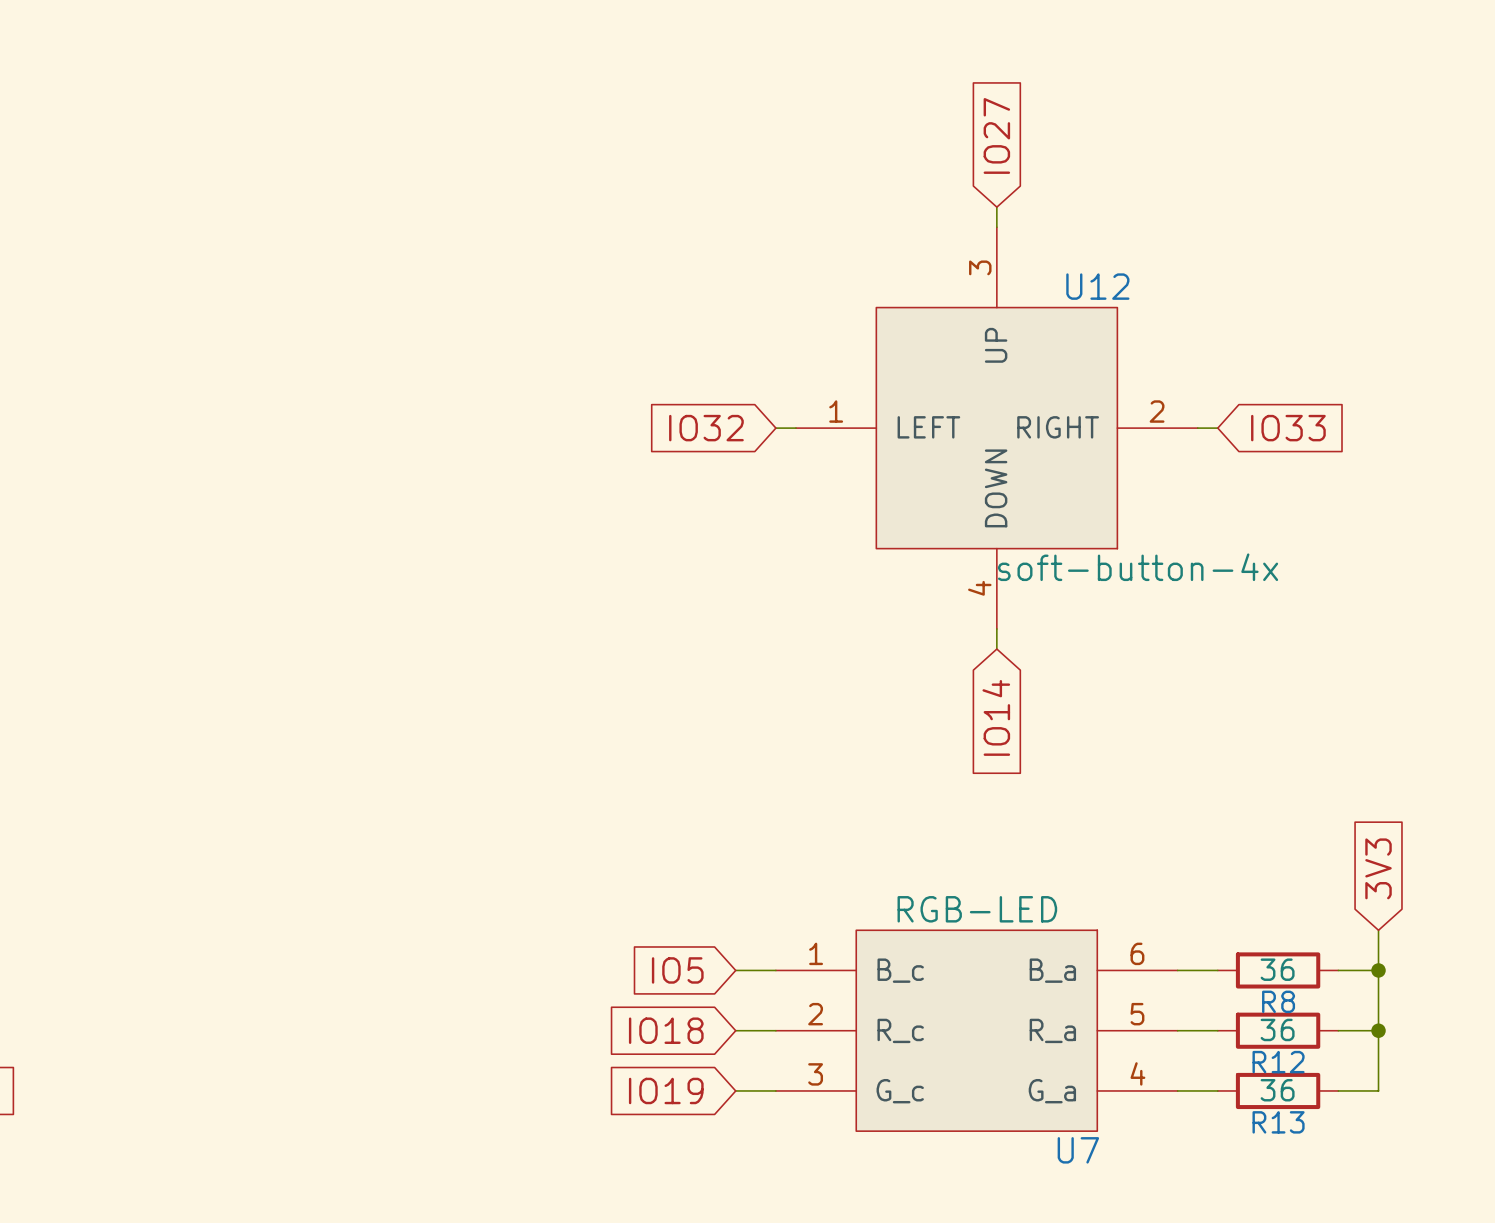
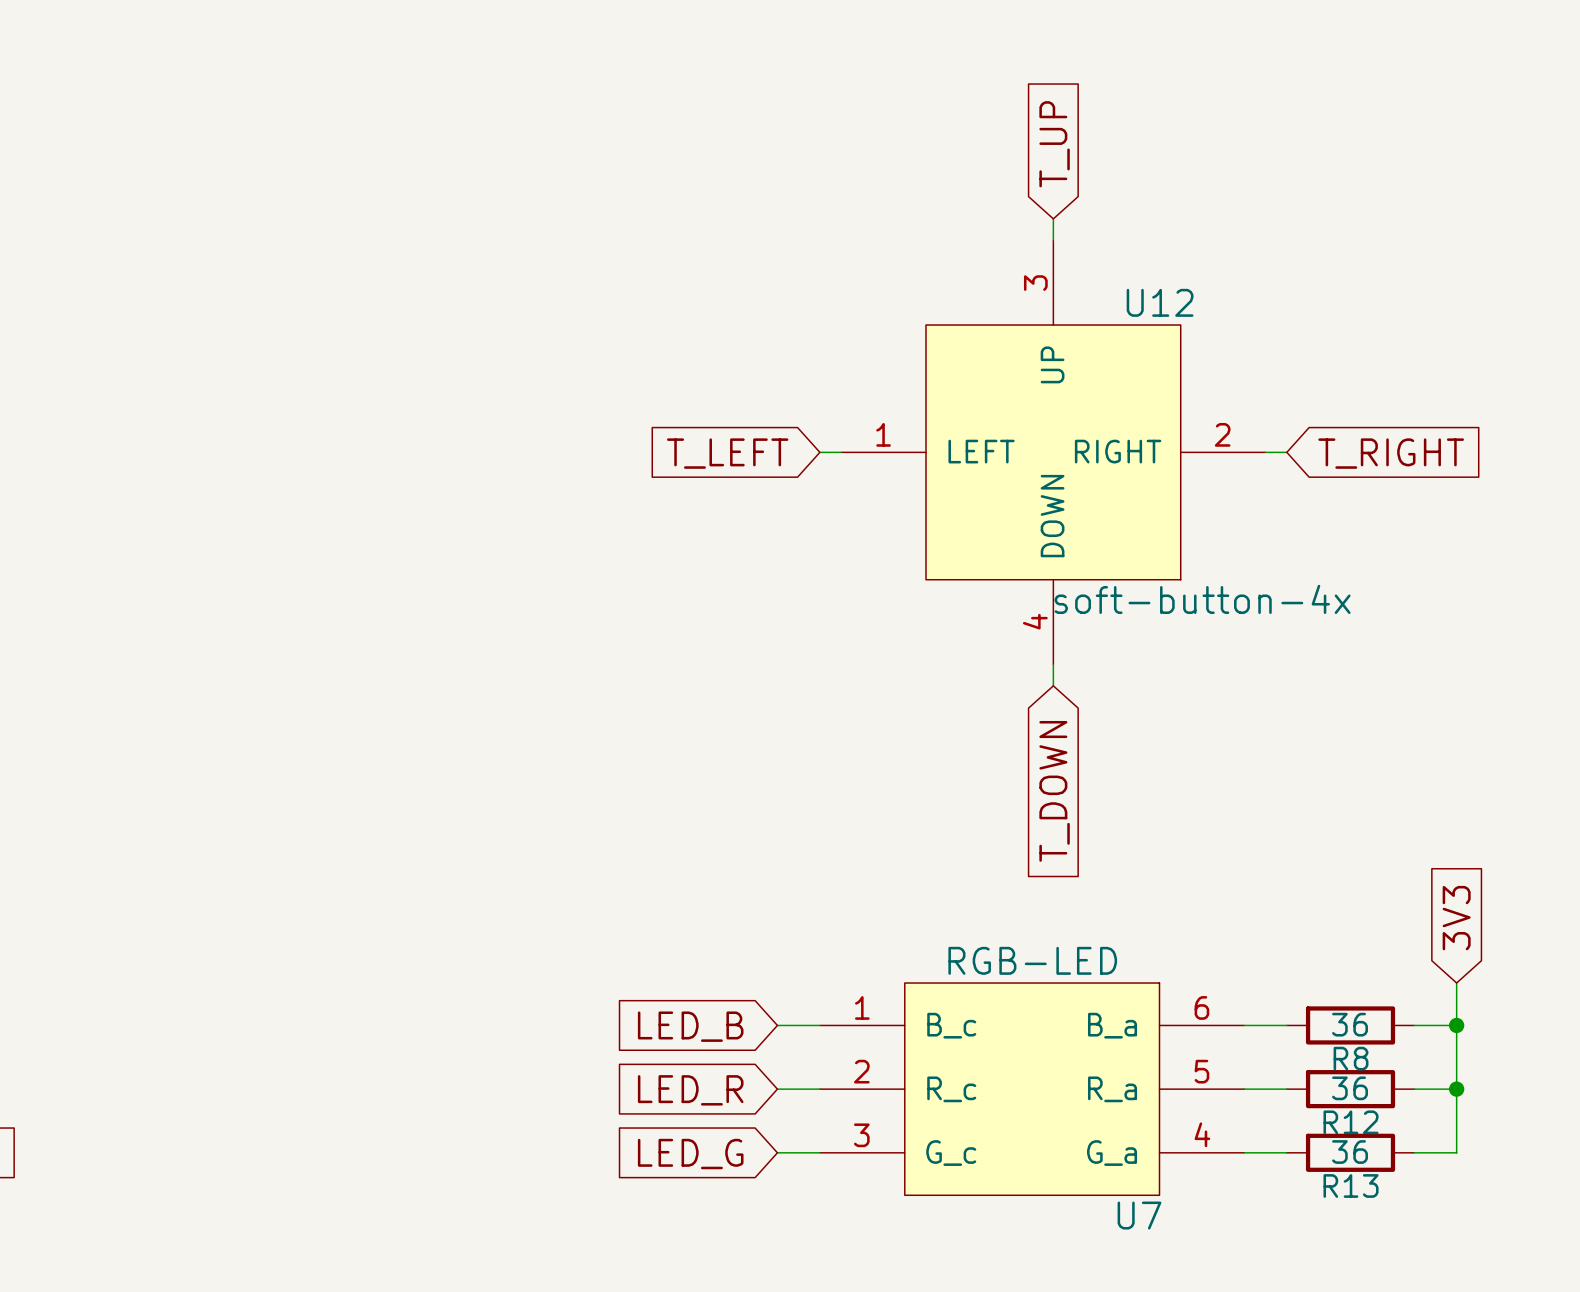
global label: IO27 (996, 135) -> T_UP (1054, 144)
global label: IO32 (706, 428) -> T_LEFT (727, 453)
global label: IO33 (1288, 428) -> T_RIGHT (1391, 453)
global label: IO14 (996, 717) -> T_DOWN (1054, 791)
global label: IO5 (677, 970) -> LED_B (690, 1026)
global label: IO18 (666, 1030) -> LED_R (690, 1090)
global label: IO19 (666, 1090) -> LED_G (690, 1154)

